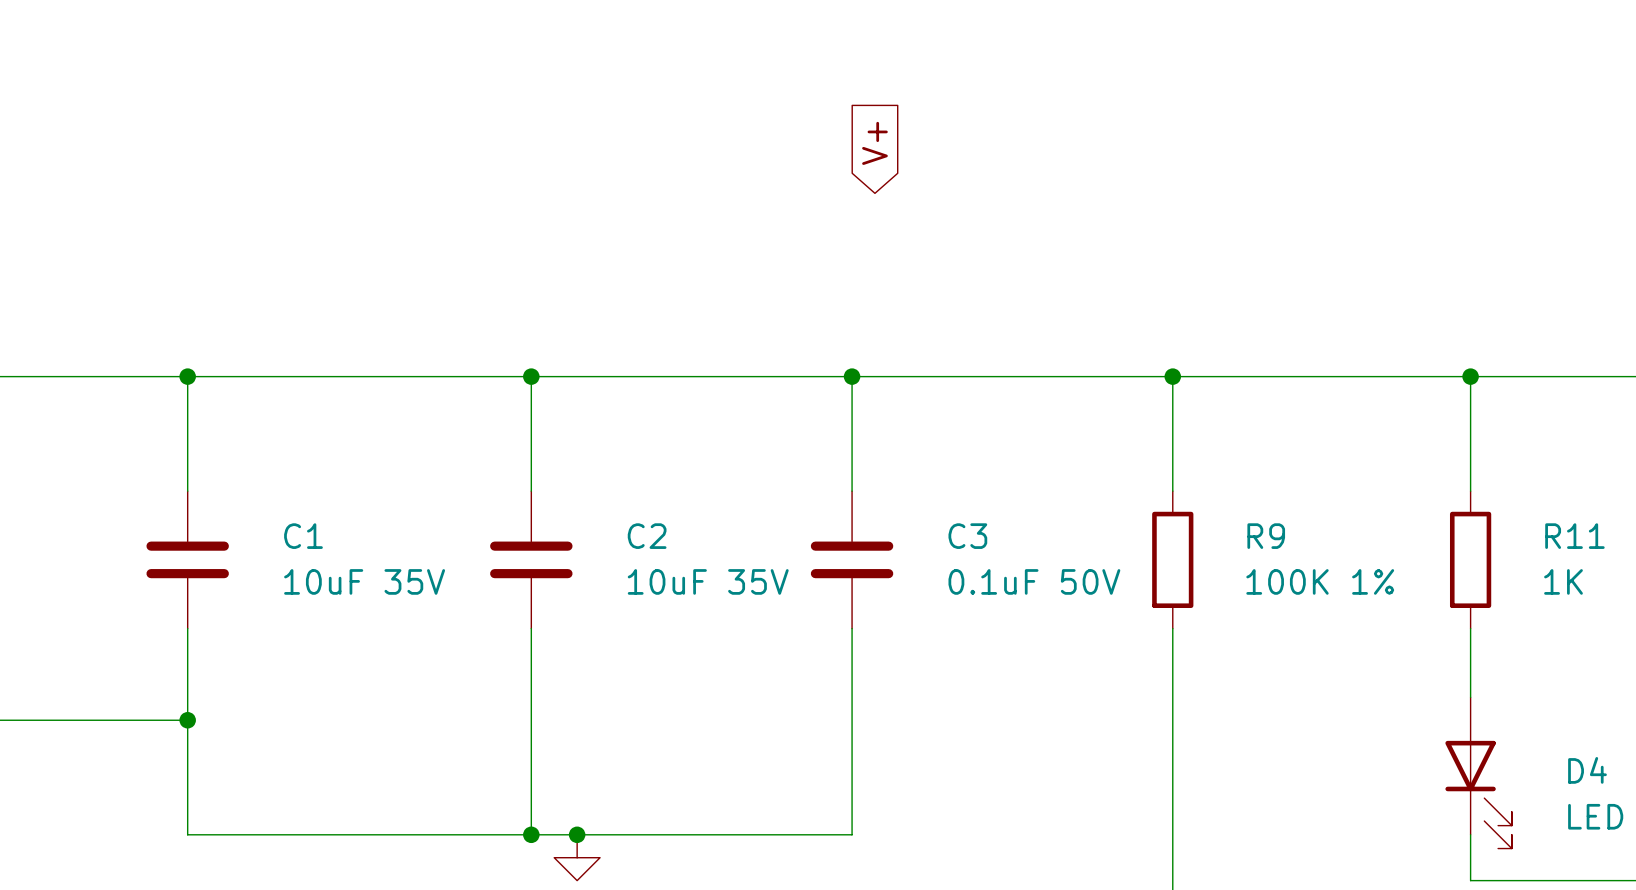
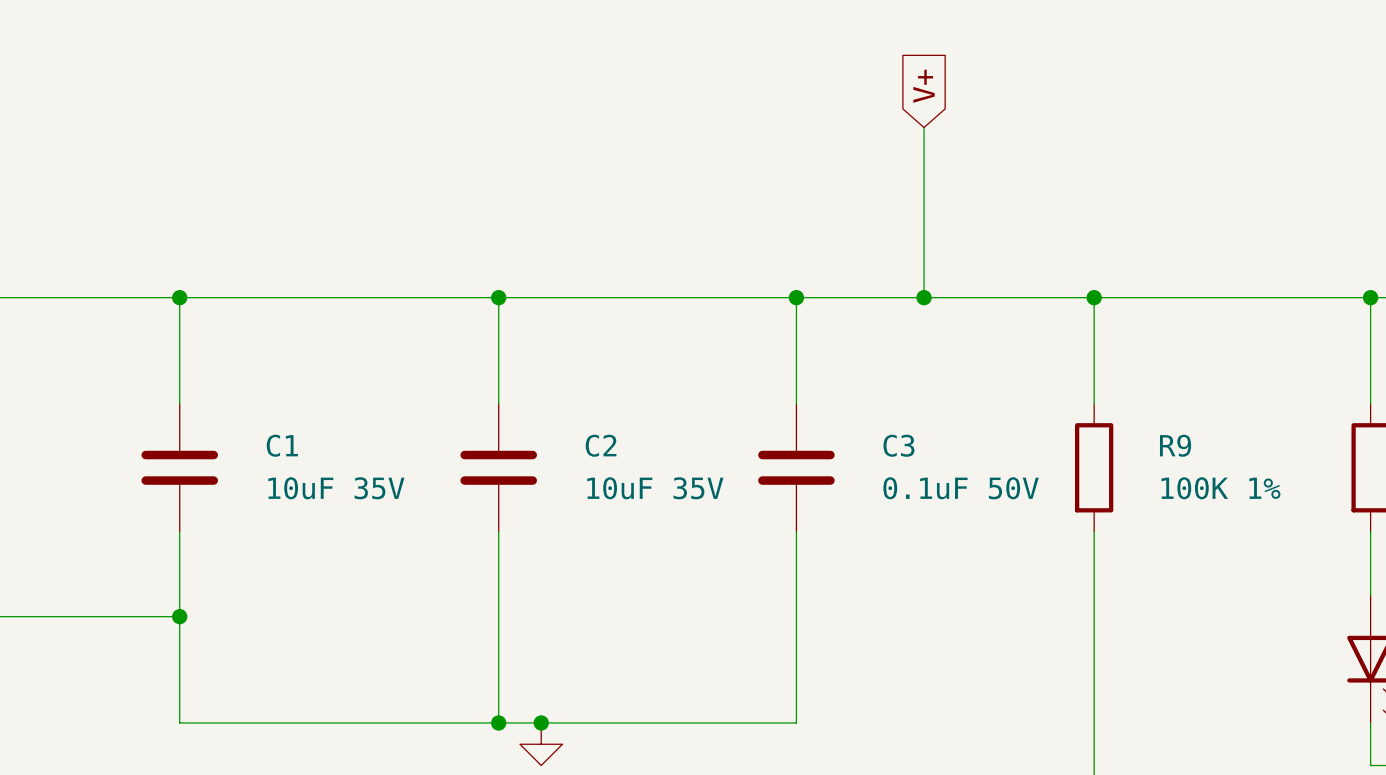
global label position: V+ (874, 143) -> V+ (924, 86)
wire: none -> (924, 127) (924, 297)
junction: none -> (924, 297)

